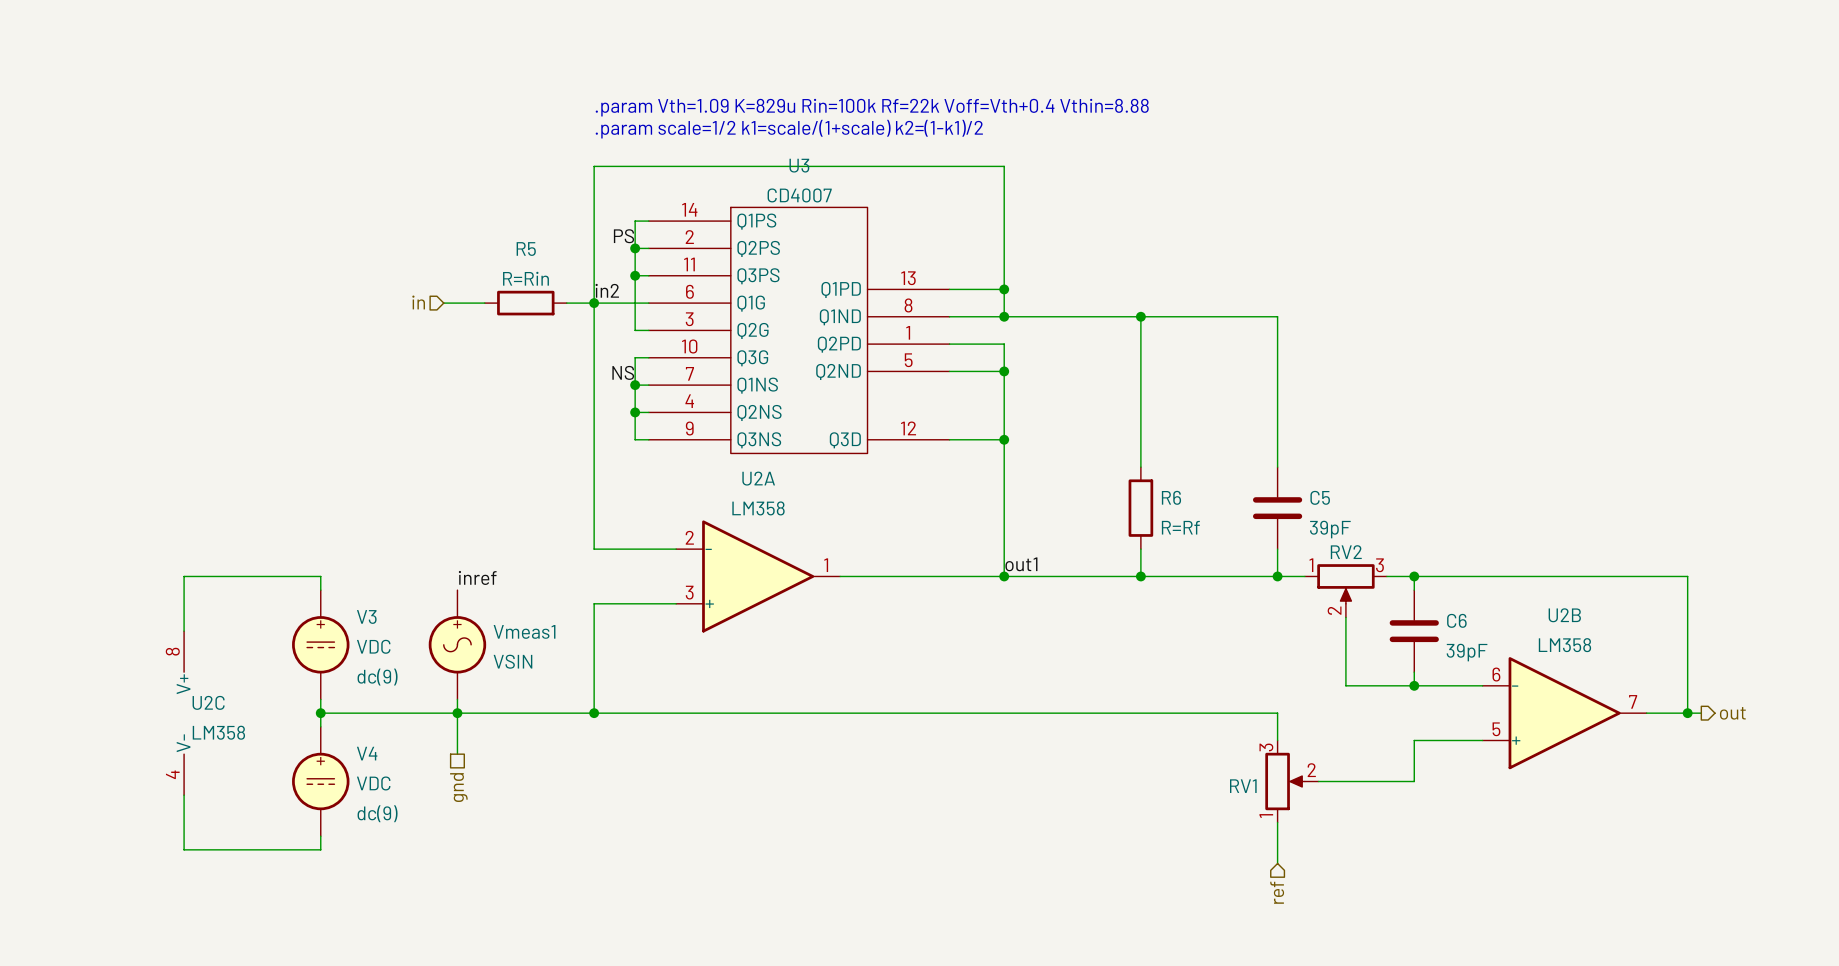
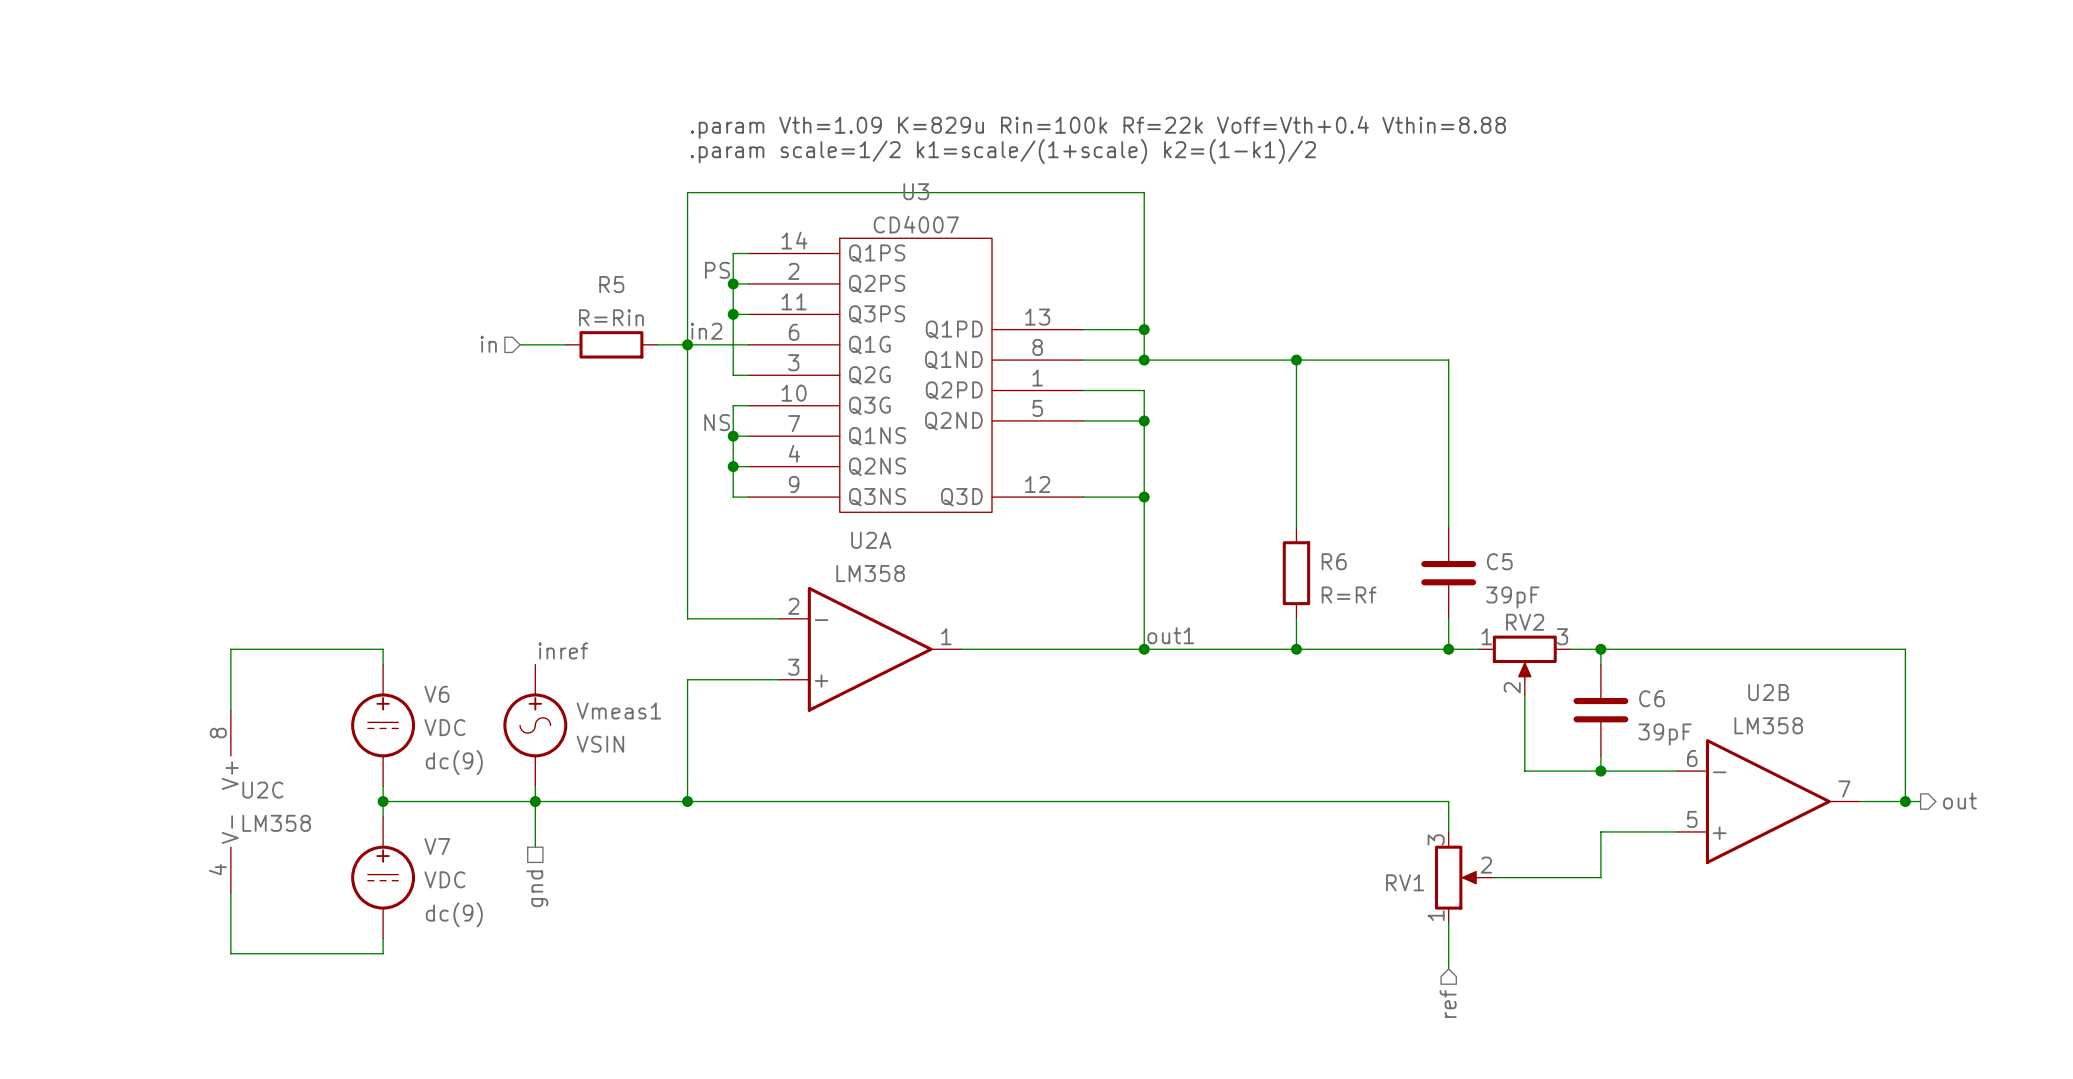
V3 name: V3 (366, 616) -> V6 (436, 694)
V4 name: V4 (367, 753) -> V7 (437, 846)

